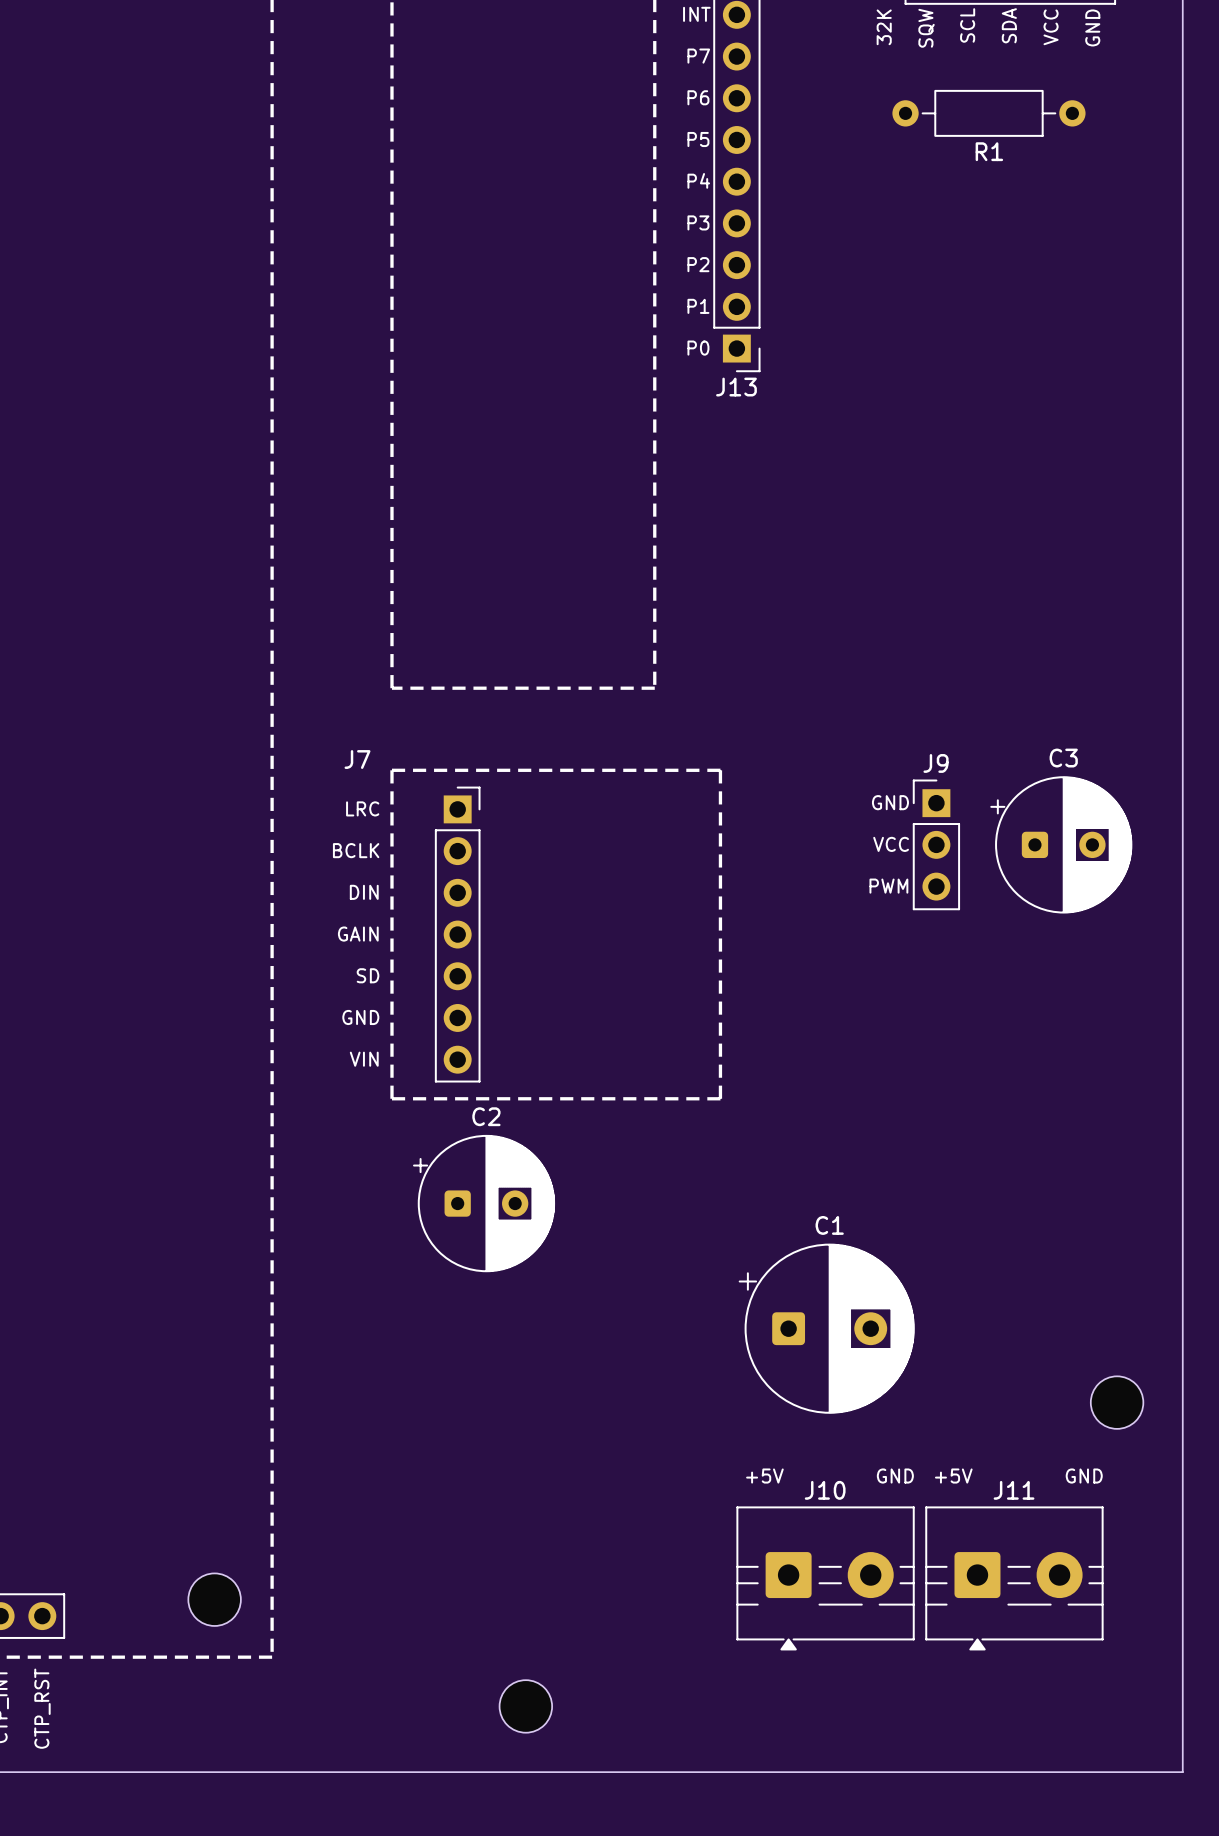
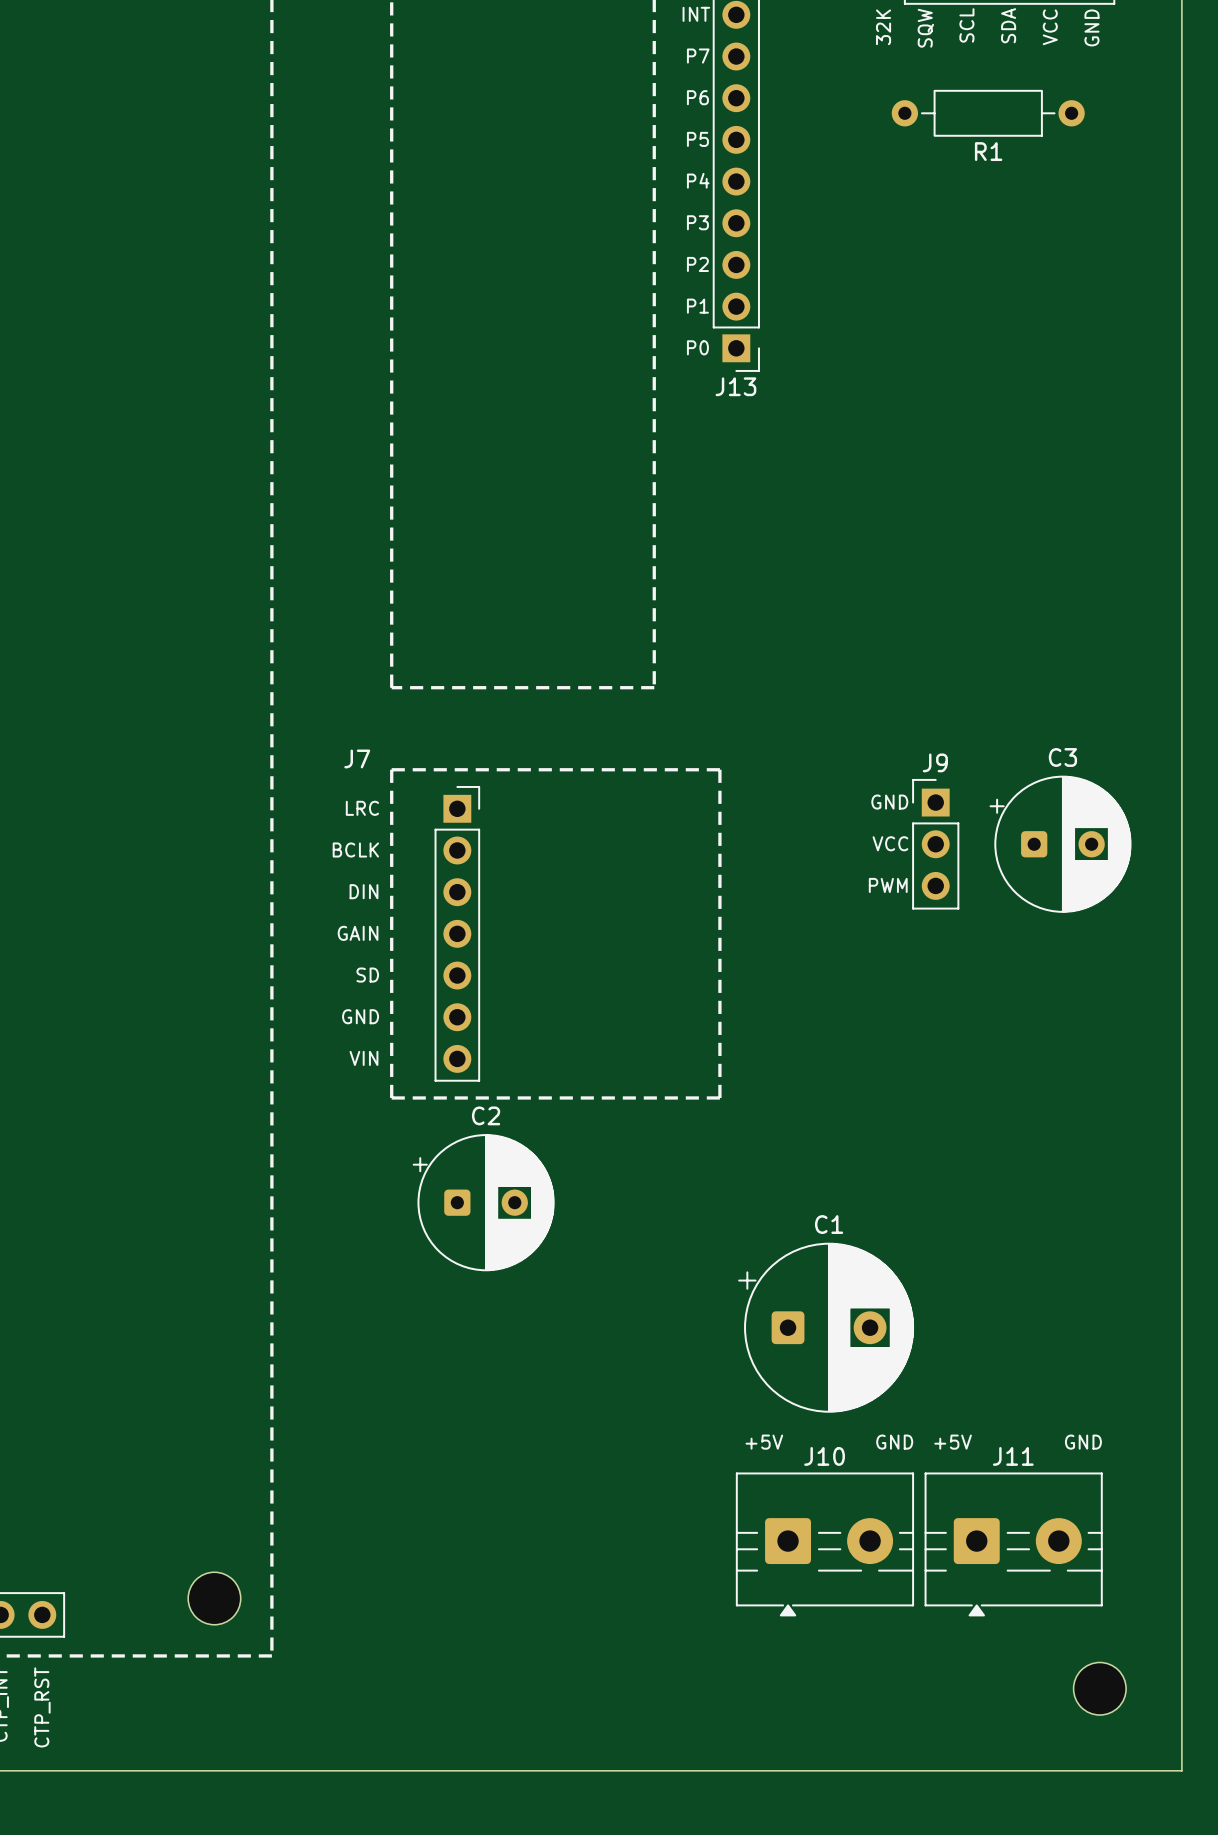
part: (1117, 1402) -> none
text position: +5V (764, 1476) -> +5V (764, 1442)
text position: GND (895, 1476) -> GND (894, 1442)
text position: +5V (953, 1476) -> +5V (953, 1442)
text position: GND (1084, 1476) -> GND (1083, 1442)
J10 position: (825, 1578) -> (824, 1544)
J11 position: (1014, 1578) -> (1013, 1544)
part: none -> (1099, 1688)
part: (525, 1706) -> none

